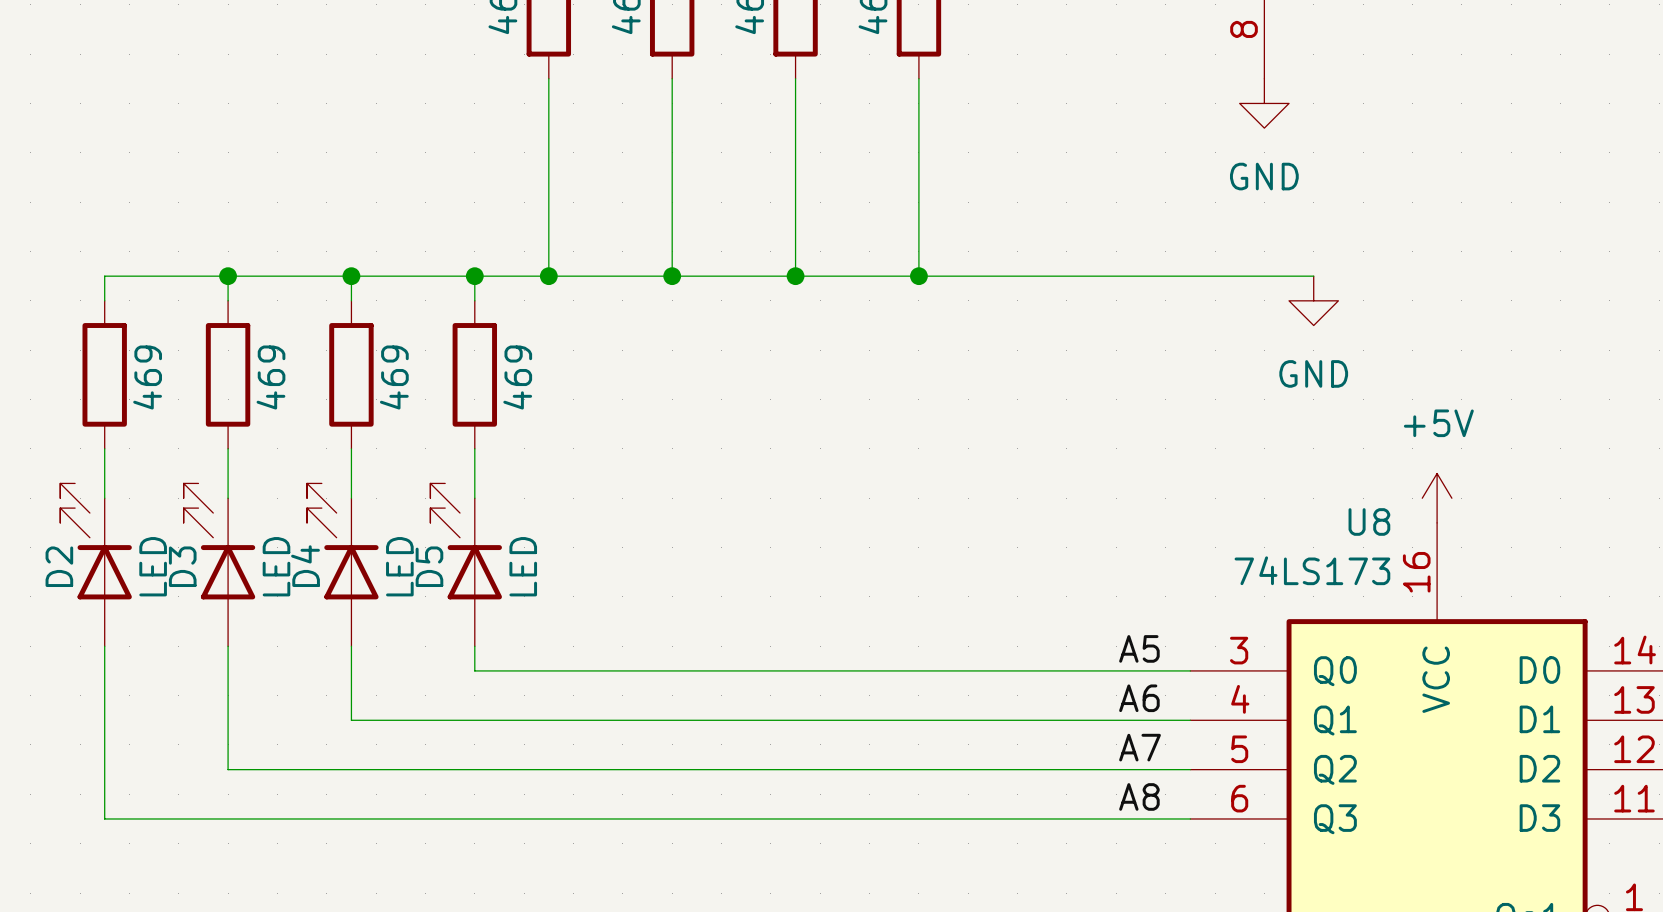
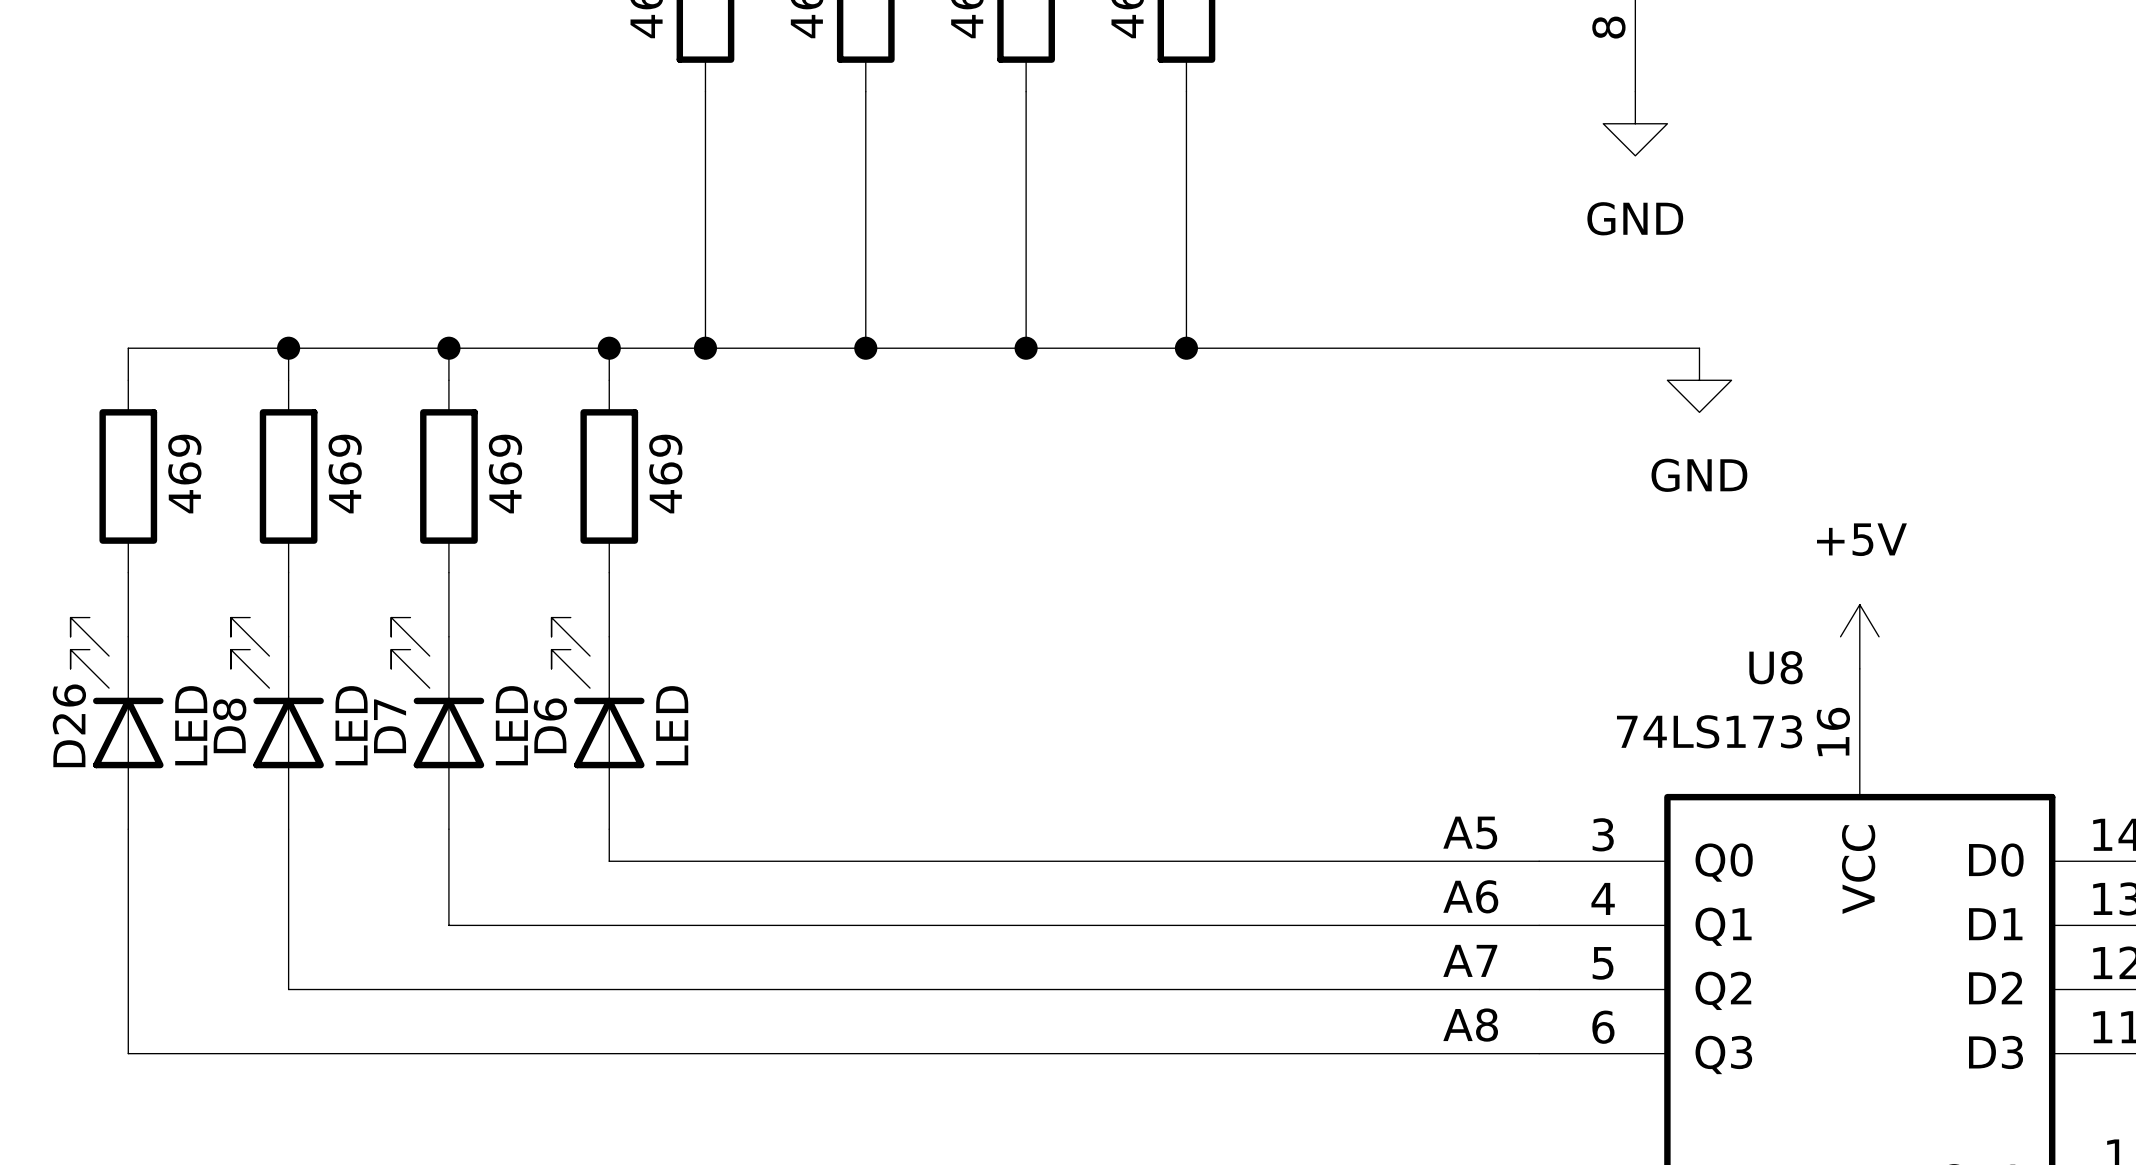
D2 name: D2 (59, 566) -> D26 (69, 725)
D3 name: D3 (182, 566) -> D8 (229, 725)
D4 name: D4 (305, 566) -> D7 (390, 726)
D5 name: D5 (429, 566) -> D6 (550, 725)

